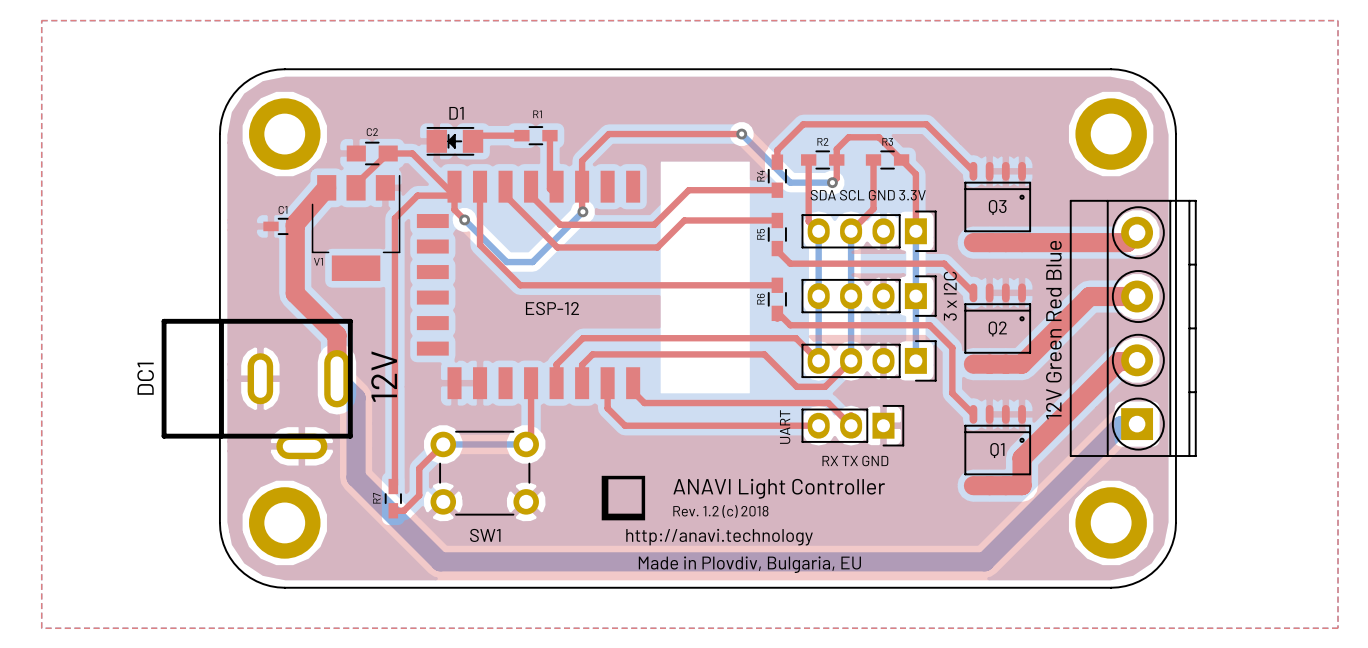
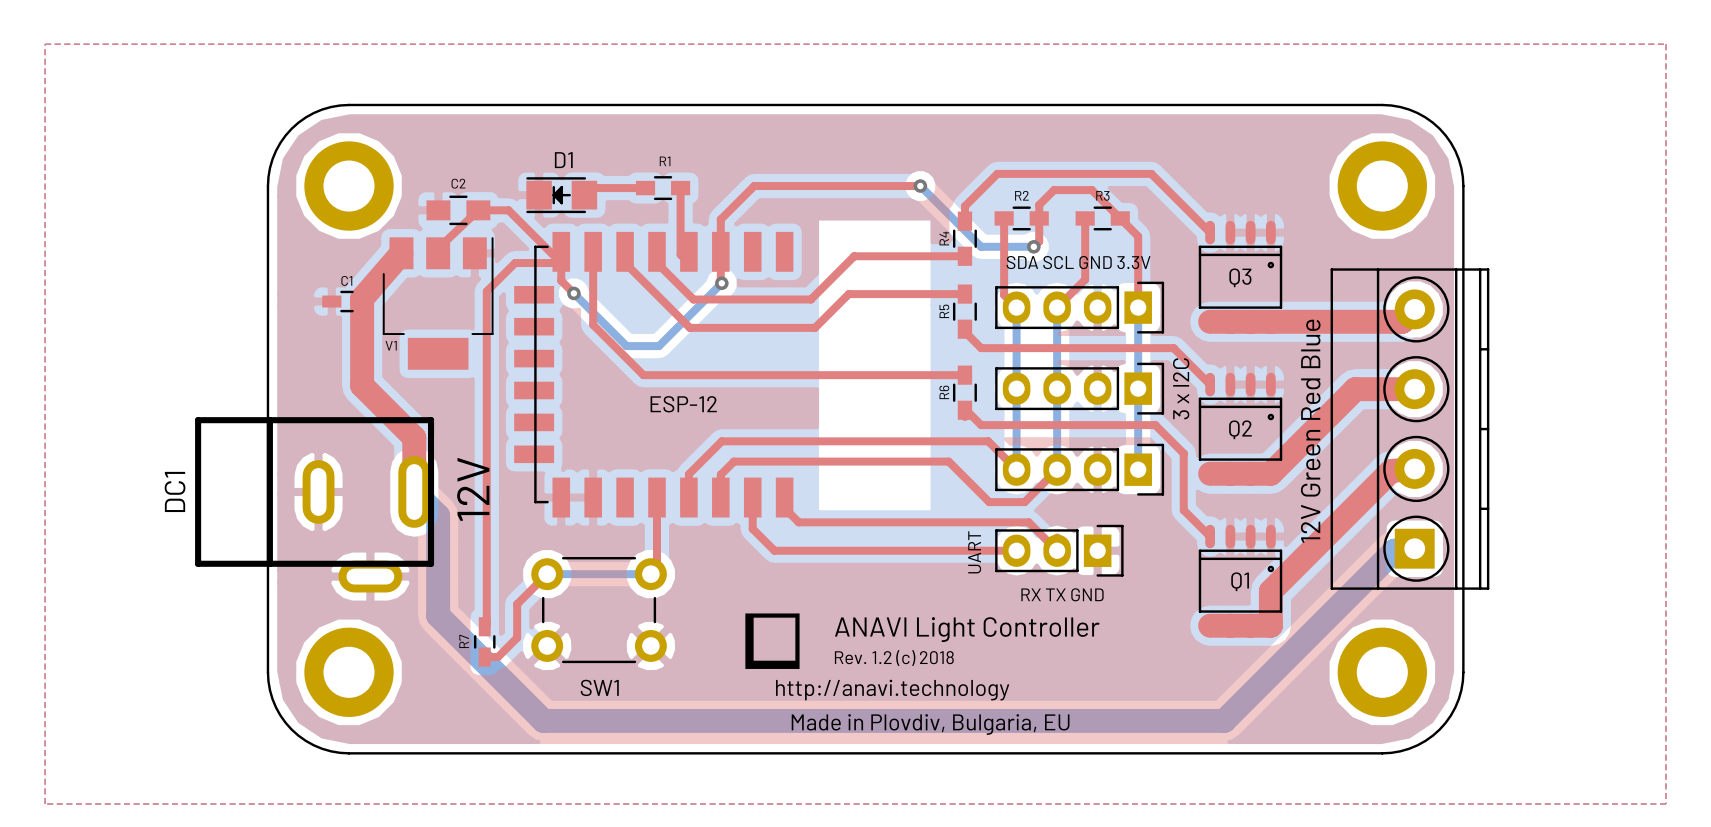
ESP-12 footprint: [416, 170, 641, 400] -> [514, 231, 794, 518]

